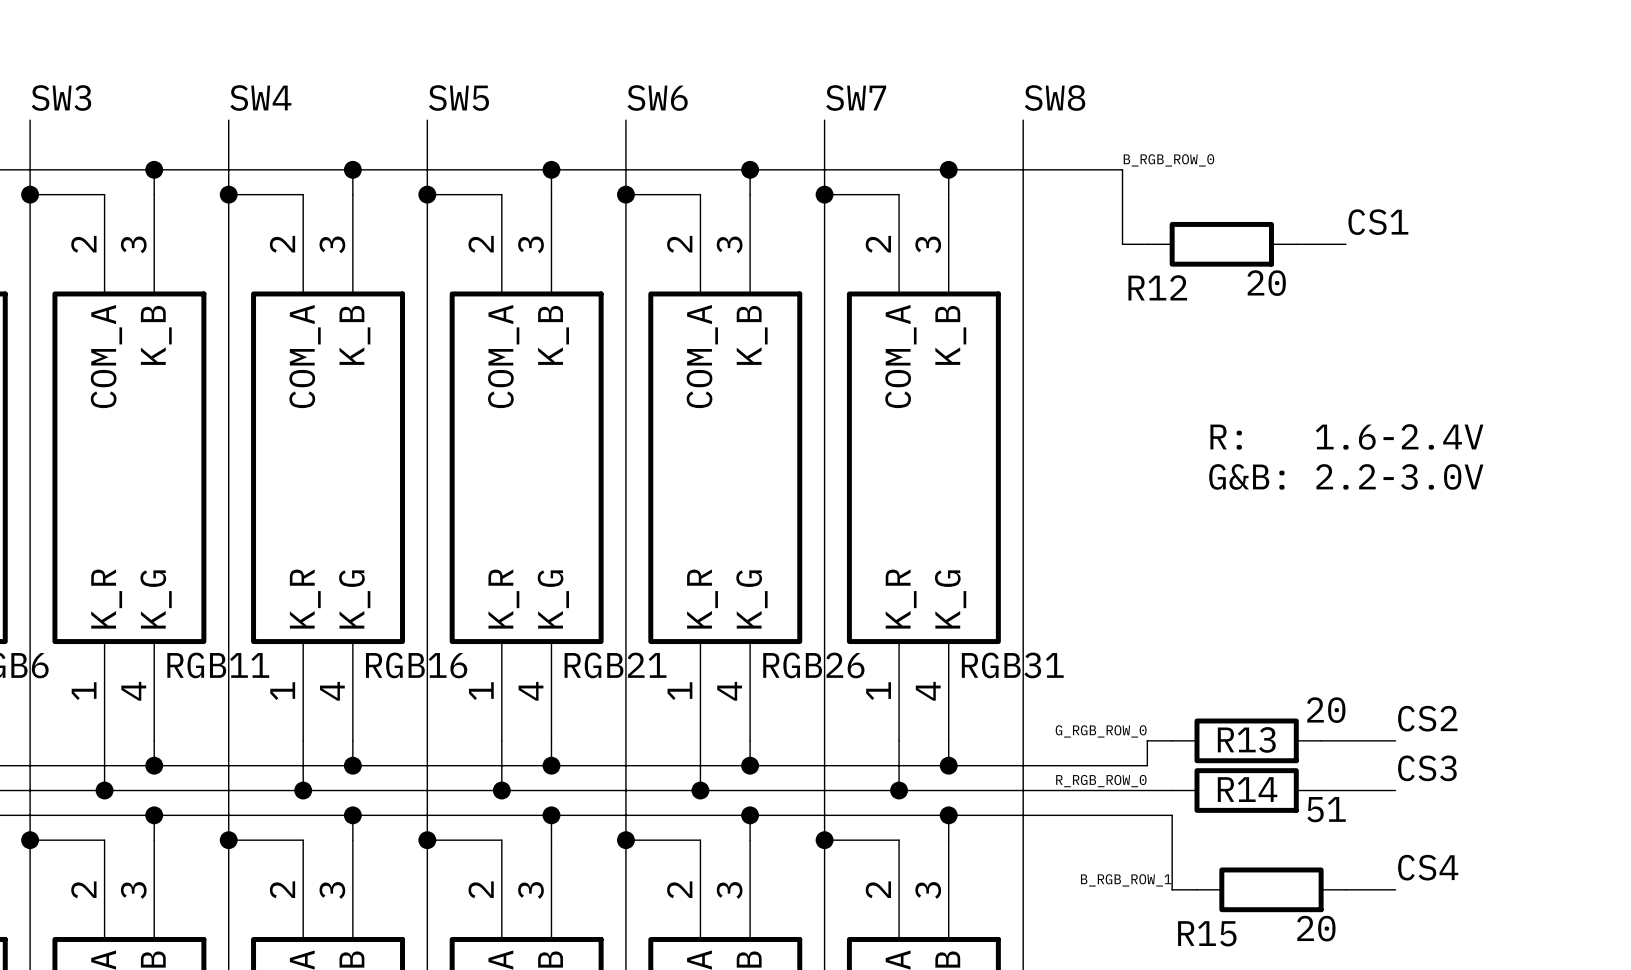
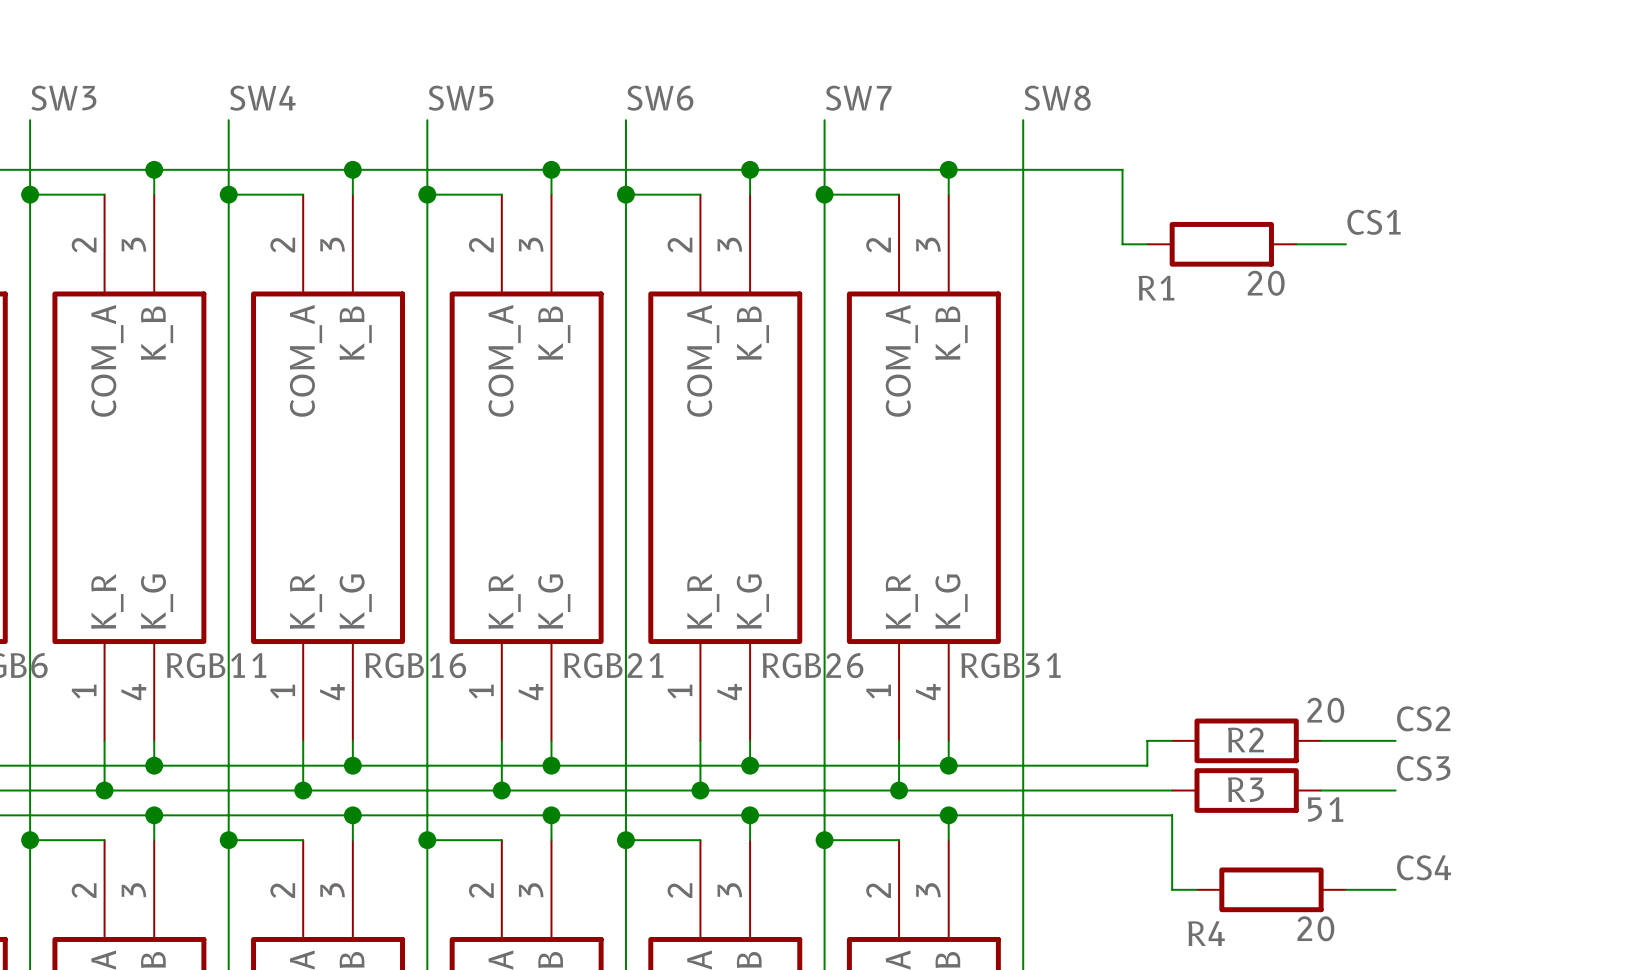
label: B_RGB_ROW_0 (1168, 160) -> none
R12 name: R12 (1157, 287) -> R1 (1156, 288)
text: R: 1.6-2.4V (1346, 436) -> none
text: G&B: 2.2-3.0V (1346, 476) -> none
label: G_RGB_ROW_0 (1101, 731) -> none
R13 name: R13 (1246, 739) -> R2 (1245, 739)
label: R_RGB_ROW_0 (1101, 781) -> none
R14 name: R14 (1247, 789) -> R3 (1245, 789)
label: B_RGB_ROW_1 (1126, 880) -> none
R15 name: R15 (1207, 933) -> R4 (1206, 933)

